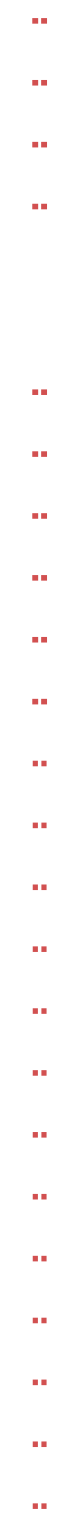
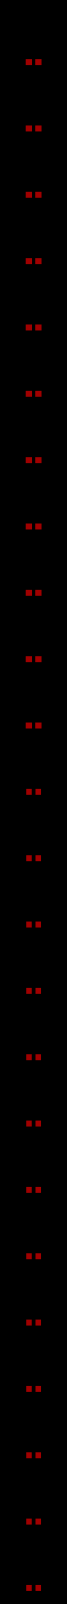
part: none -> (33, 261)
part: none -> (33, 327)

